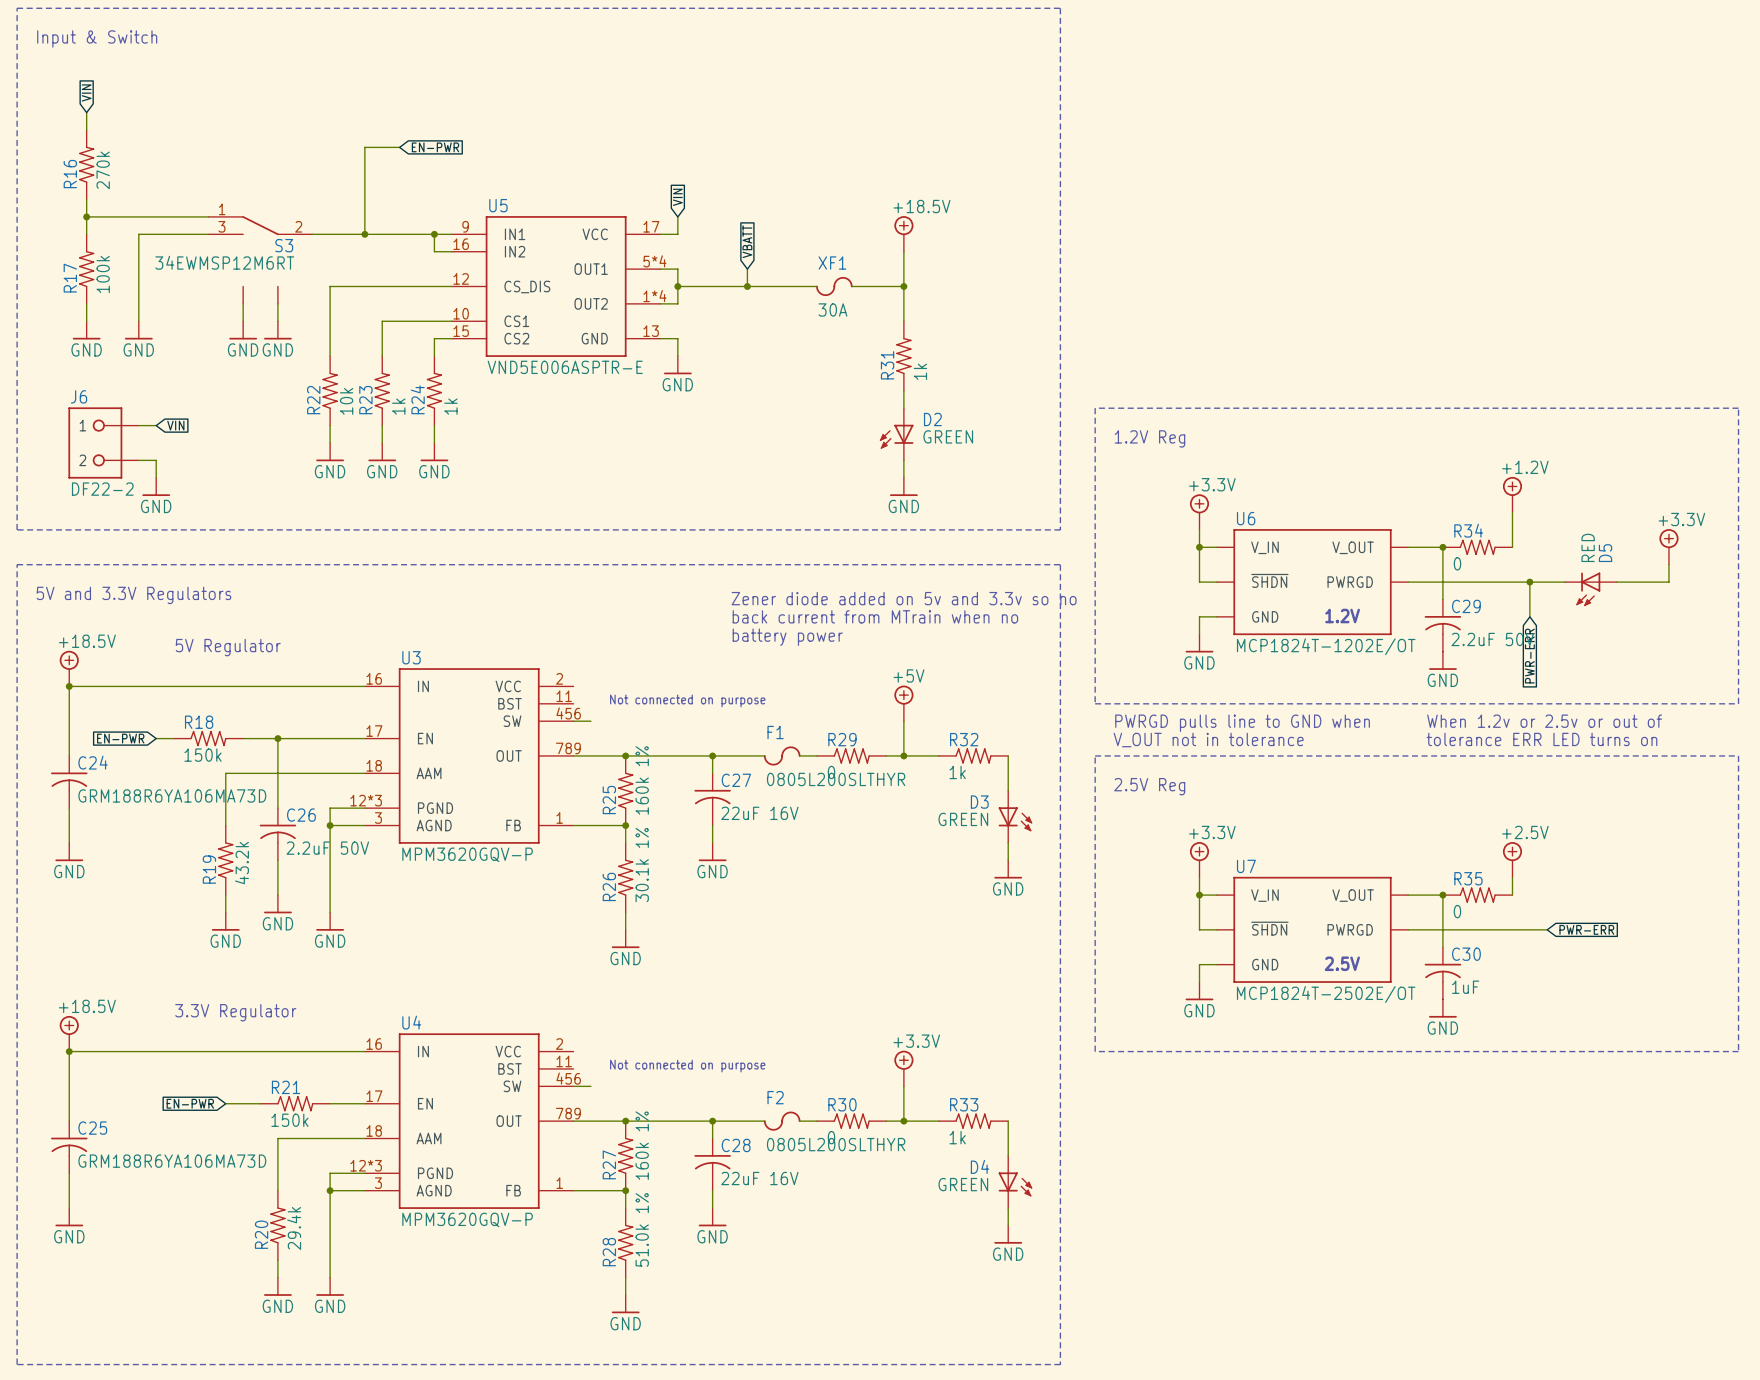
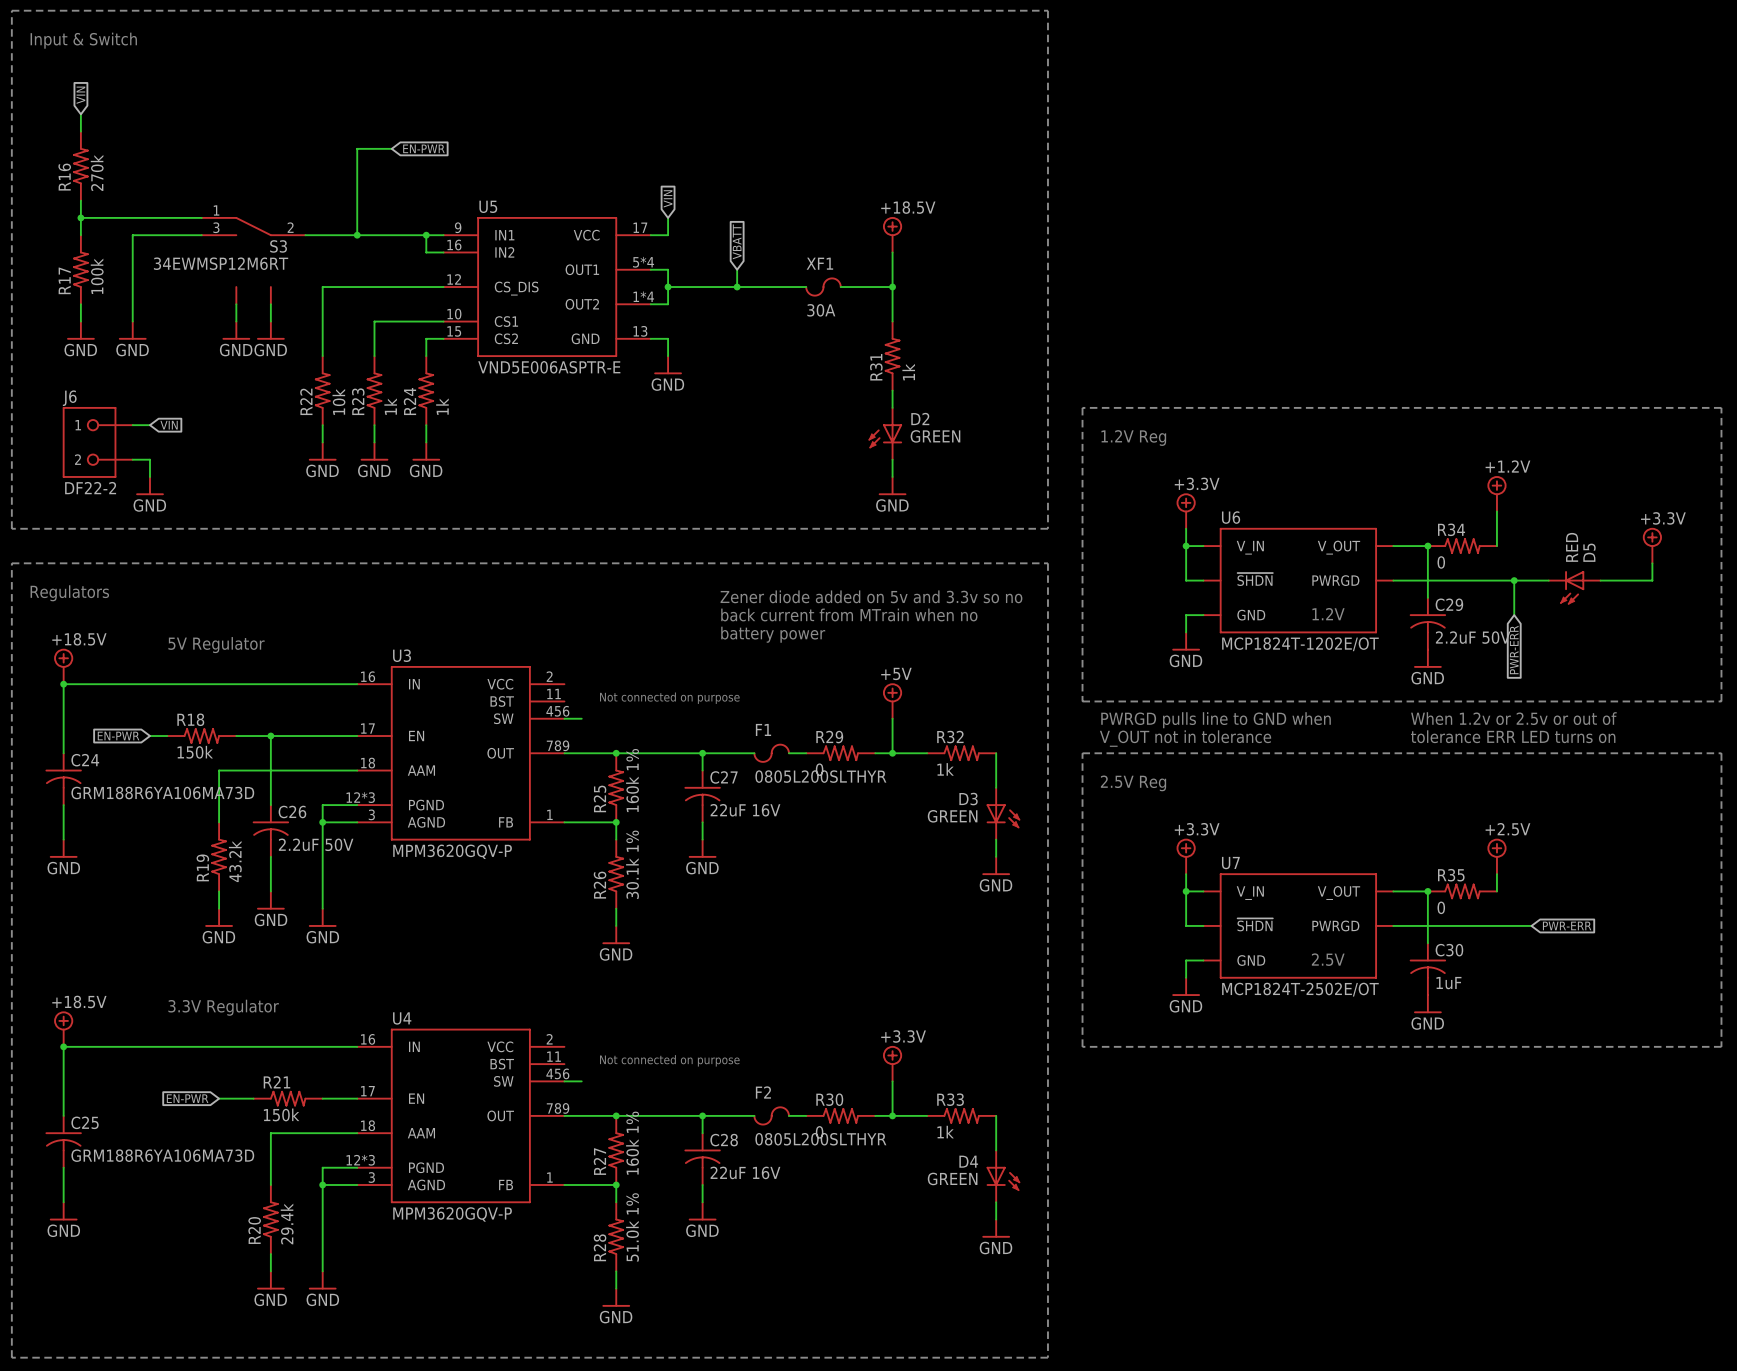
text: 5V and 3.3V Regulators (133, 595) -> Regulators (69, 593)

